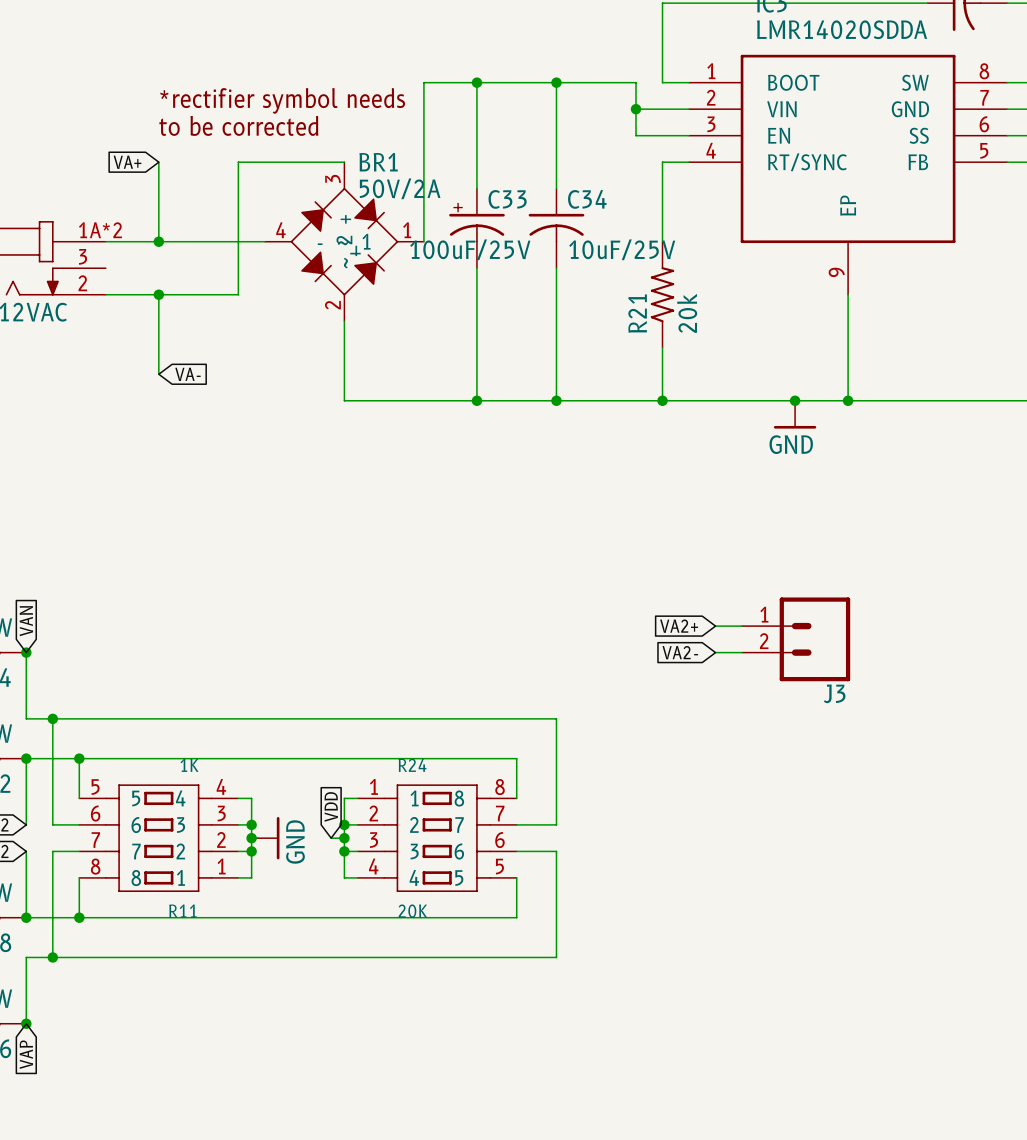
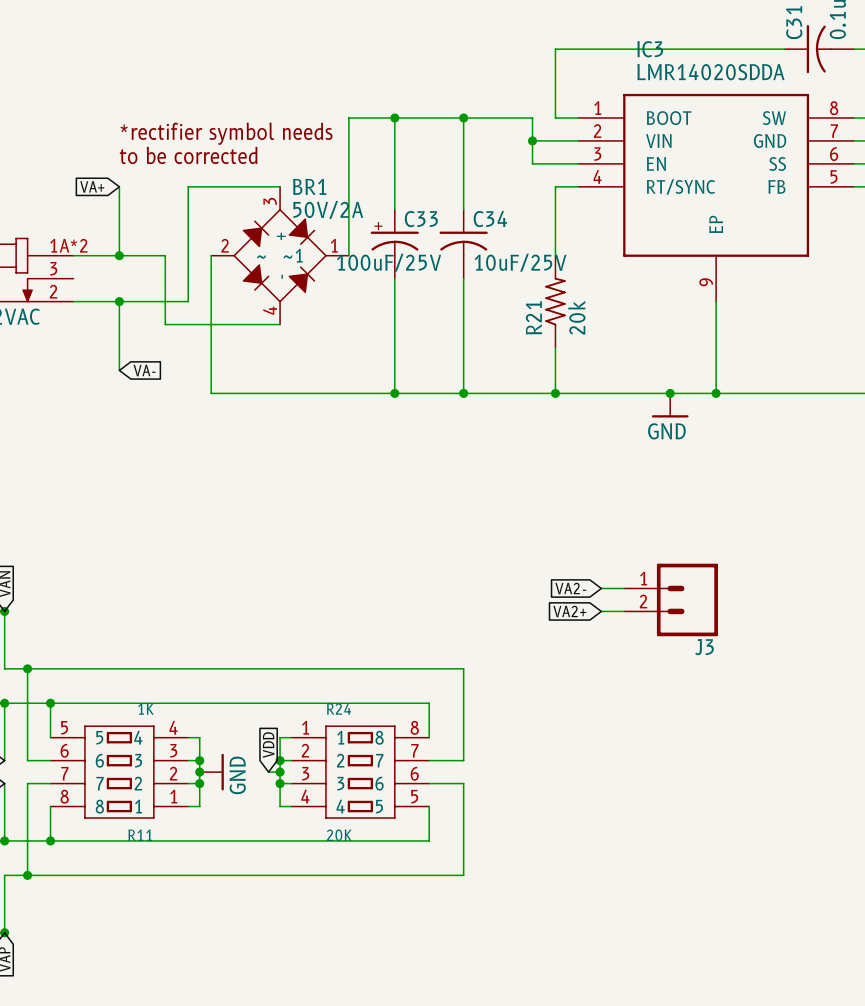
BR1 pin number: 4 (280, 230) -> 2 (225, 245)
wire: (211, 241) (264, 241) -> (165, 255) (165, 324) (280, 324)
BR1 pin name: - (320, 244) -> ~ (261, 257)
BR1 pin name: ~_1 (354, 244) -> ~1 (293, 255)
BR1 pin name: ~_2 (346, 252) -> - (282, 276)
BR1 pin number: 2 (332, 305) -> 4 (270, 310)
wire: (344, 321) (344, 400) -> (211, 255) (211, 393) (280, 393)
global label: VA2+ (679, 626) -> VA2- (570, 588)
global label: VA2- (680, 652) -> VA2+ (569, 611)

